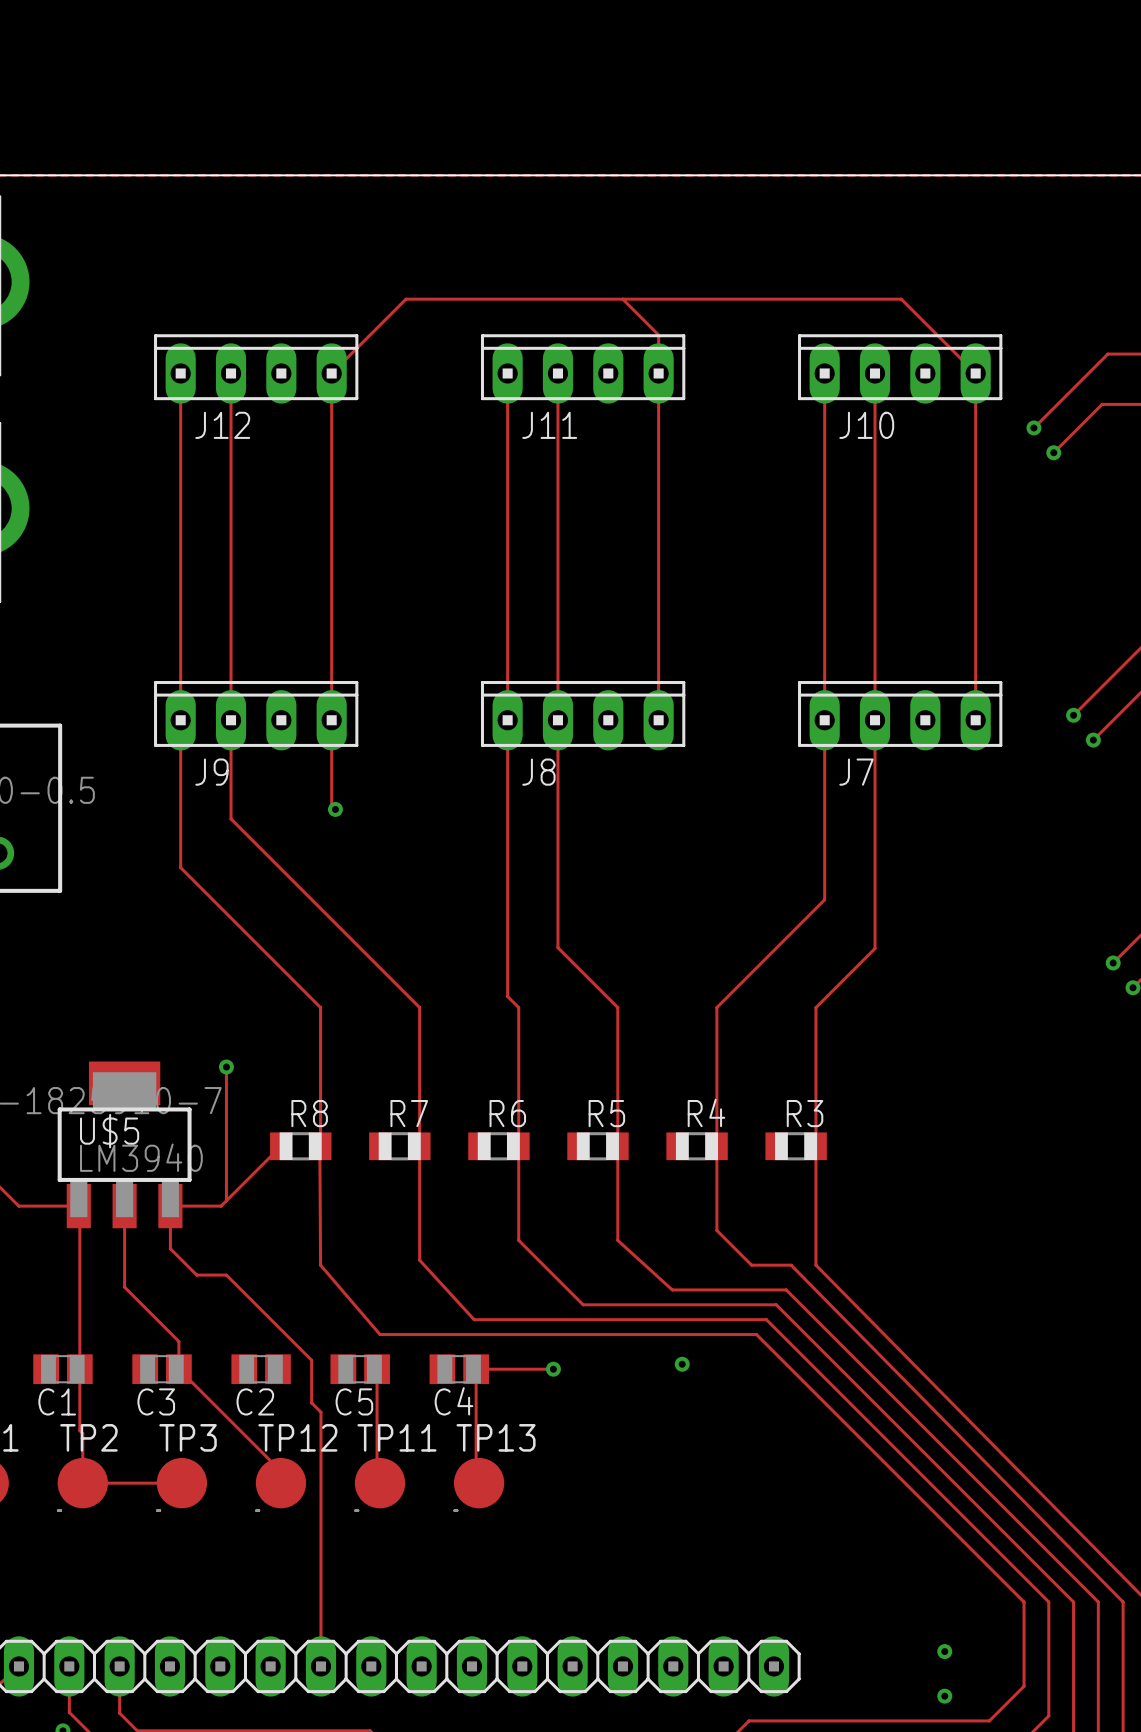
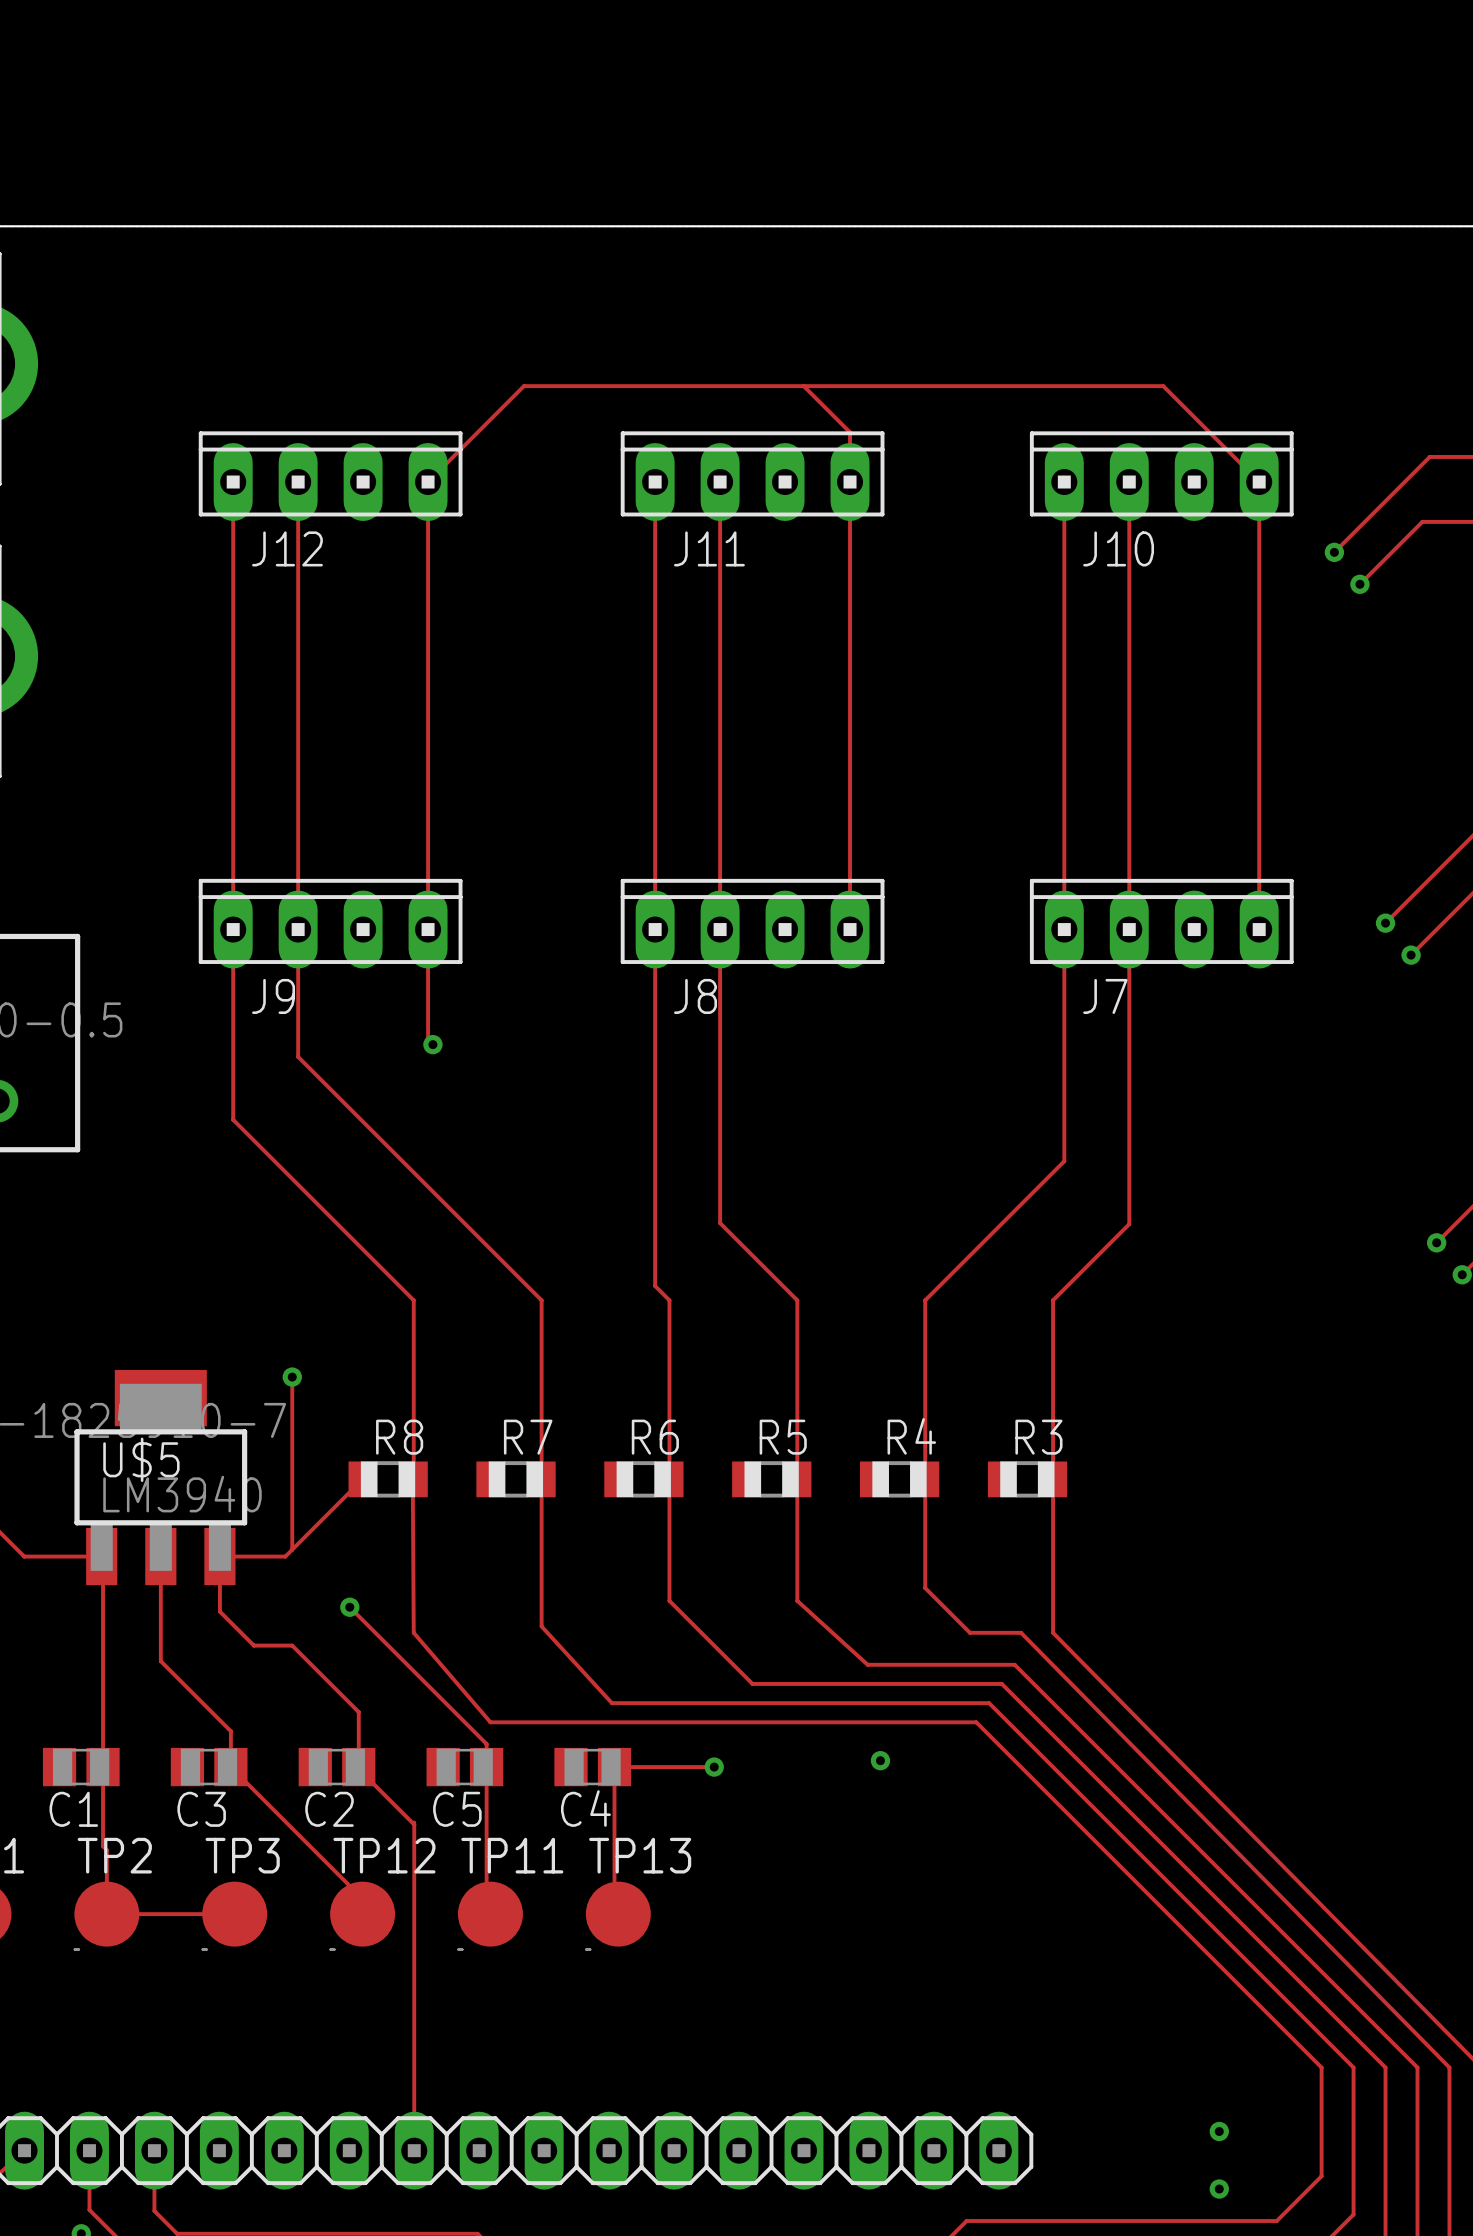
track: none -> (349, 1607) (486, 1744) (486, 1767)
via: none -> (349, 1607)
track: (277, 1326) (311, 1360) (311, 1402) (320, 1412) -> (358, 1712) (358, 1769) (414, 1824)

